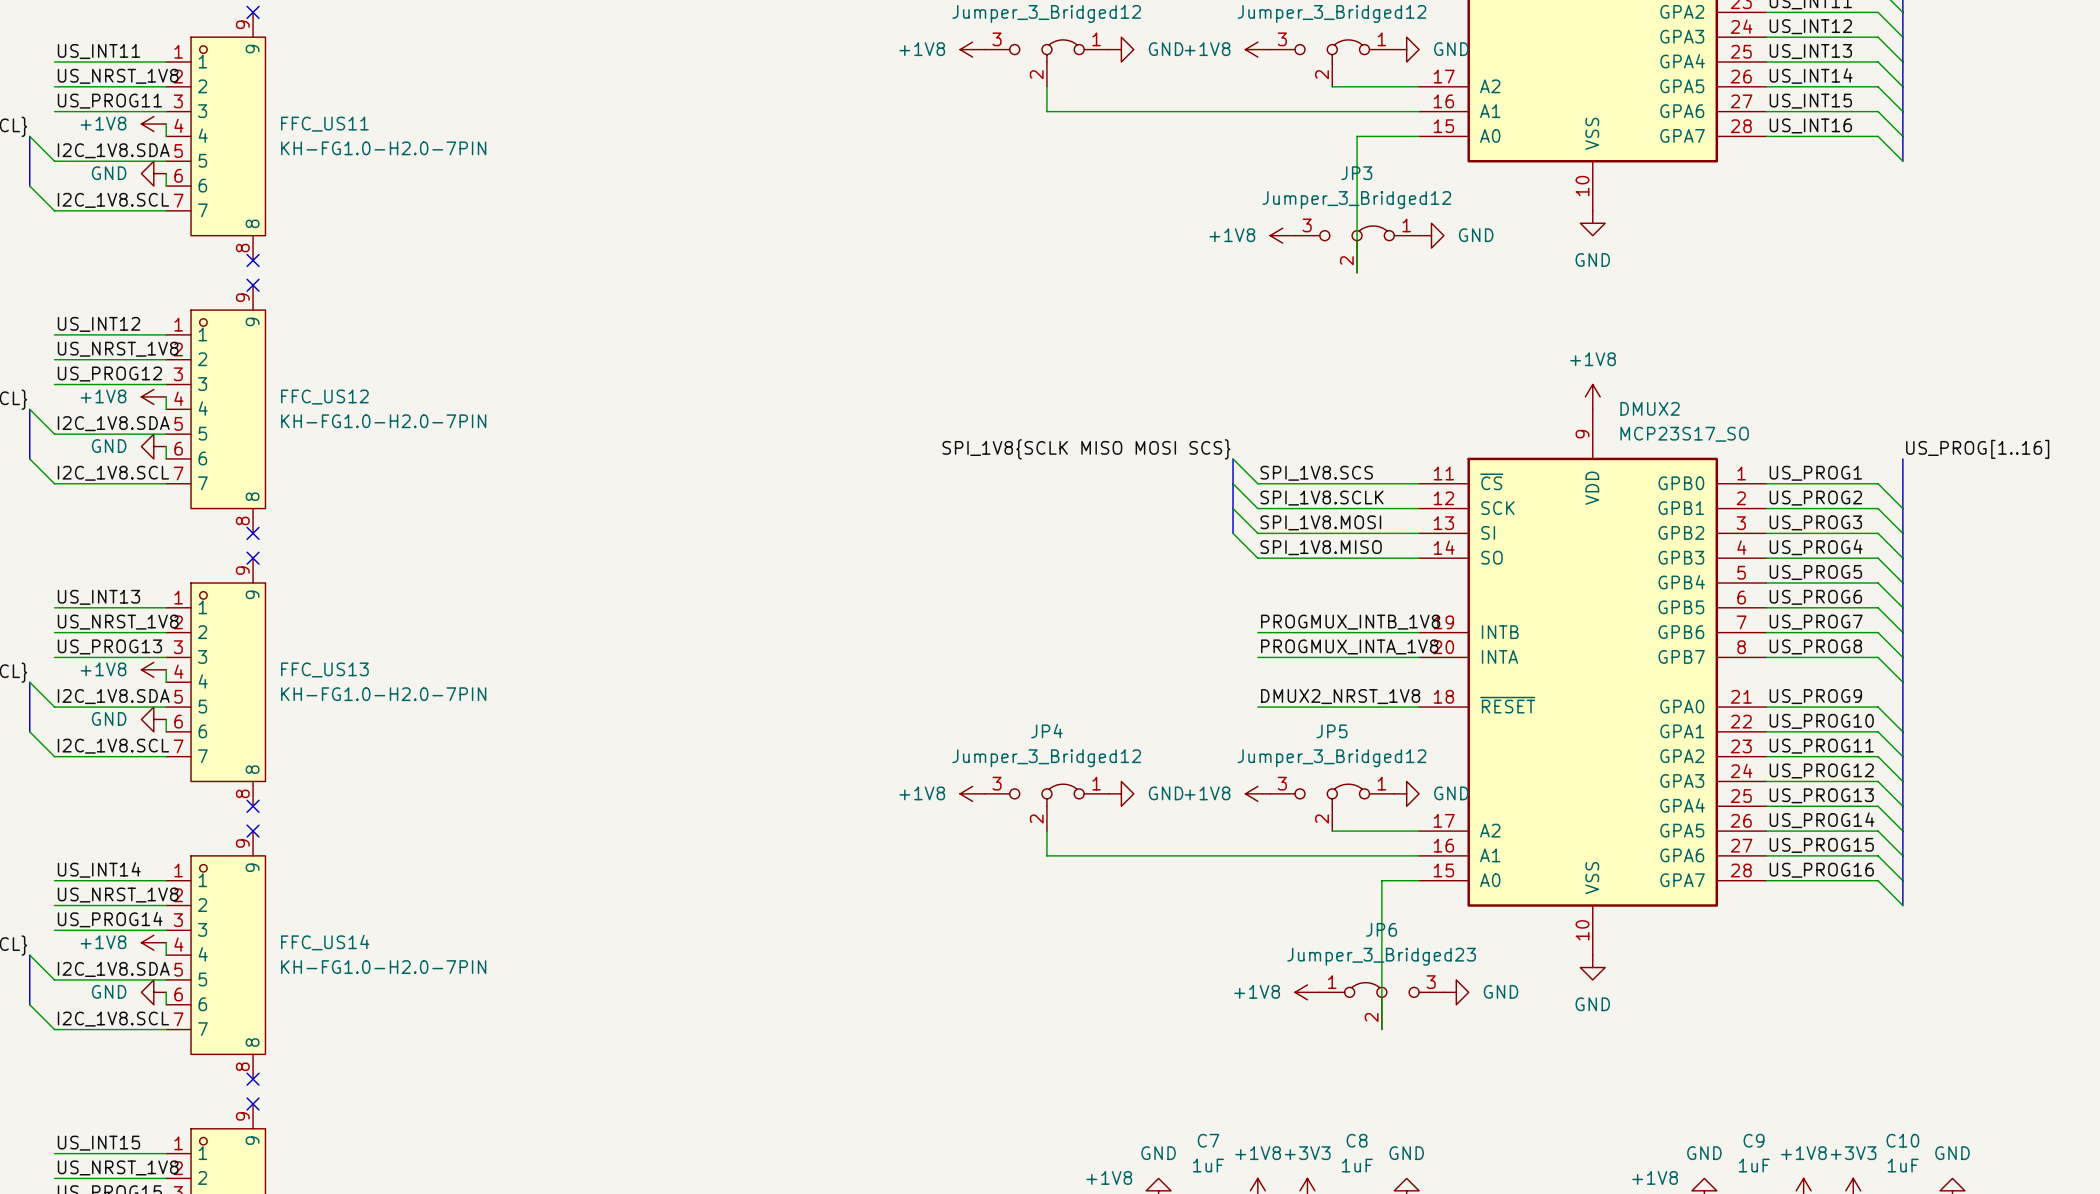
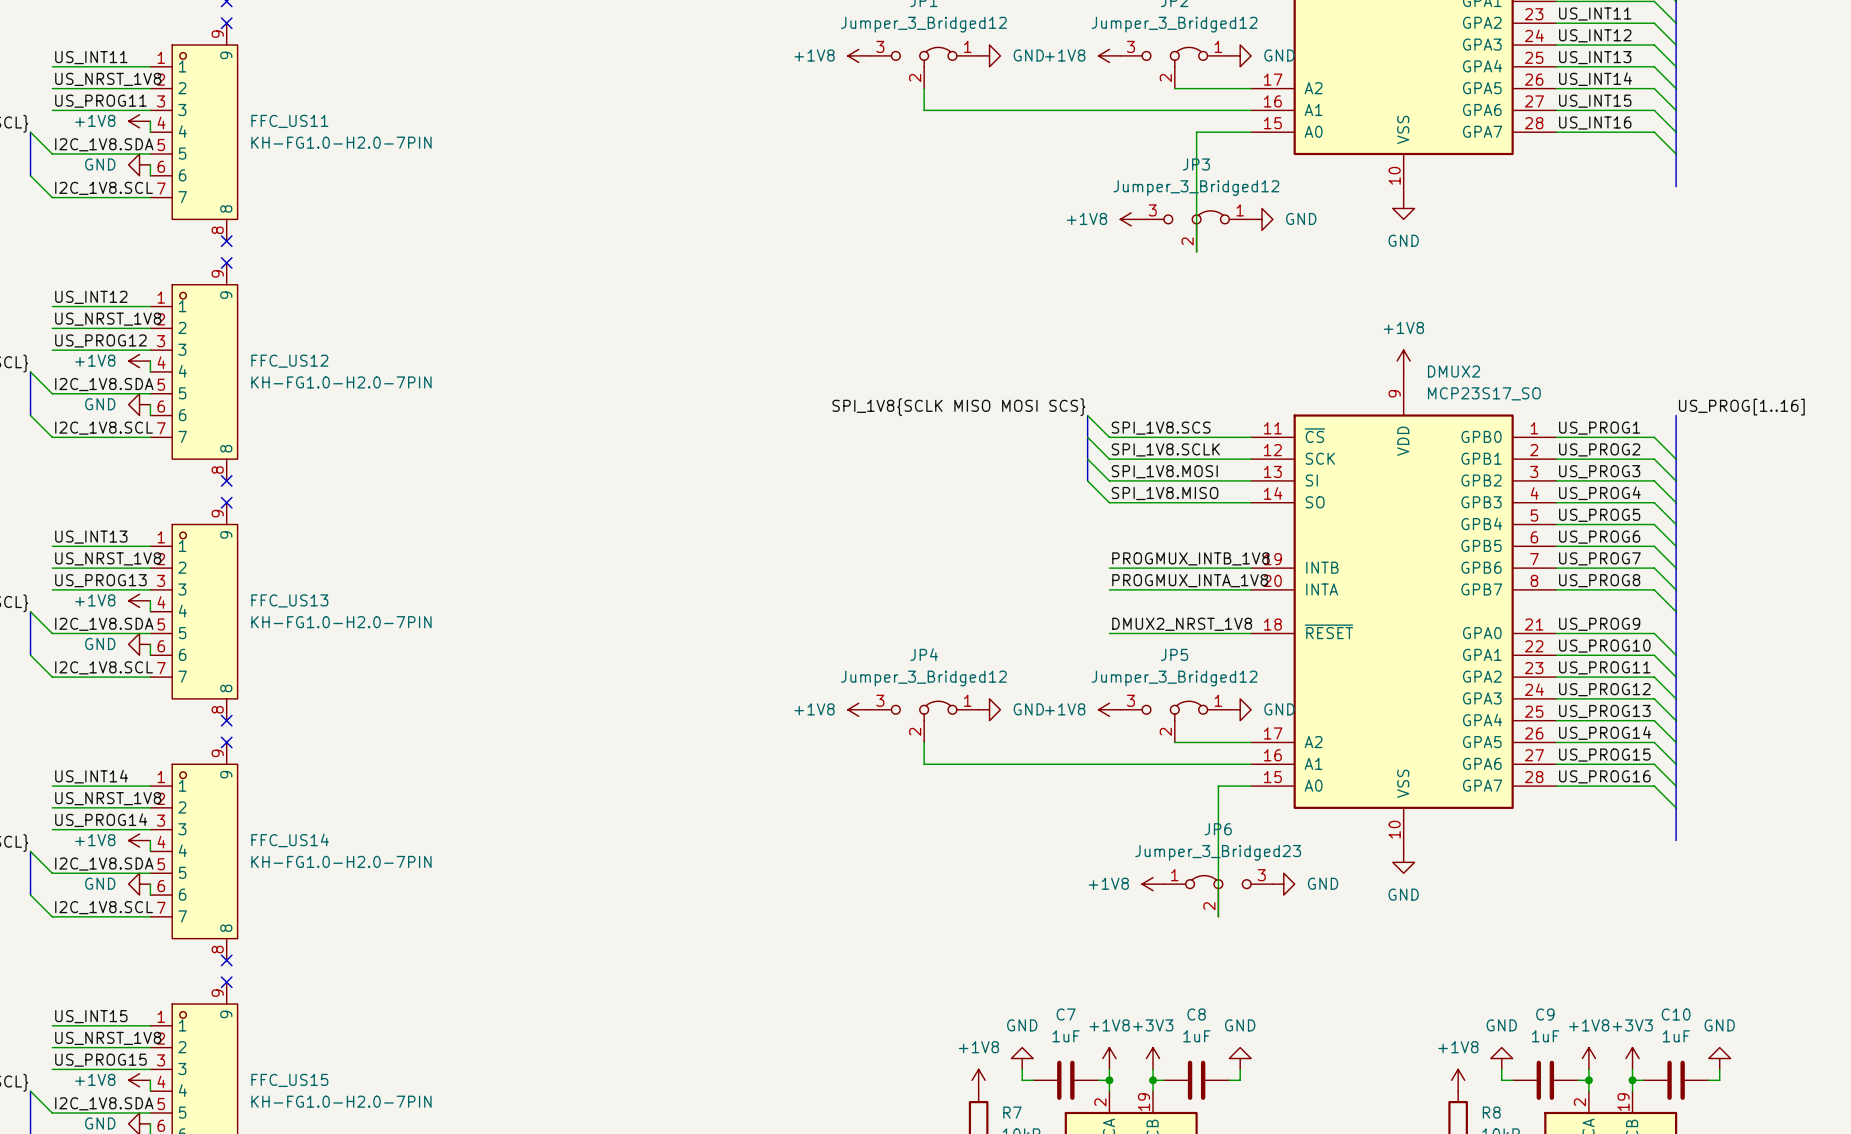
bus: none -> (1676, 153) (1676, 186)
bus: none -> (1676, 807) (1676, 840)

